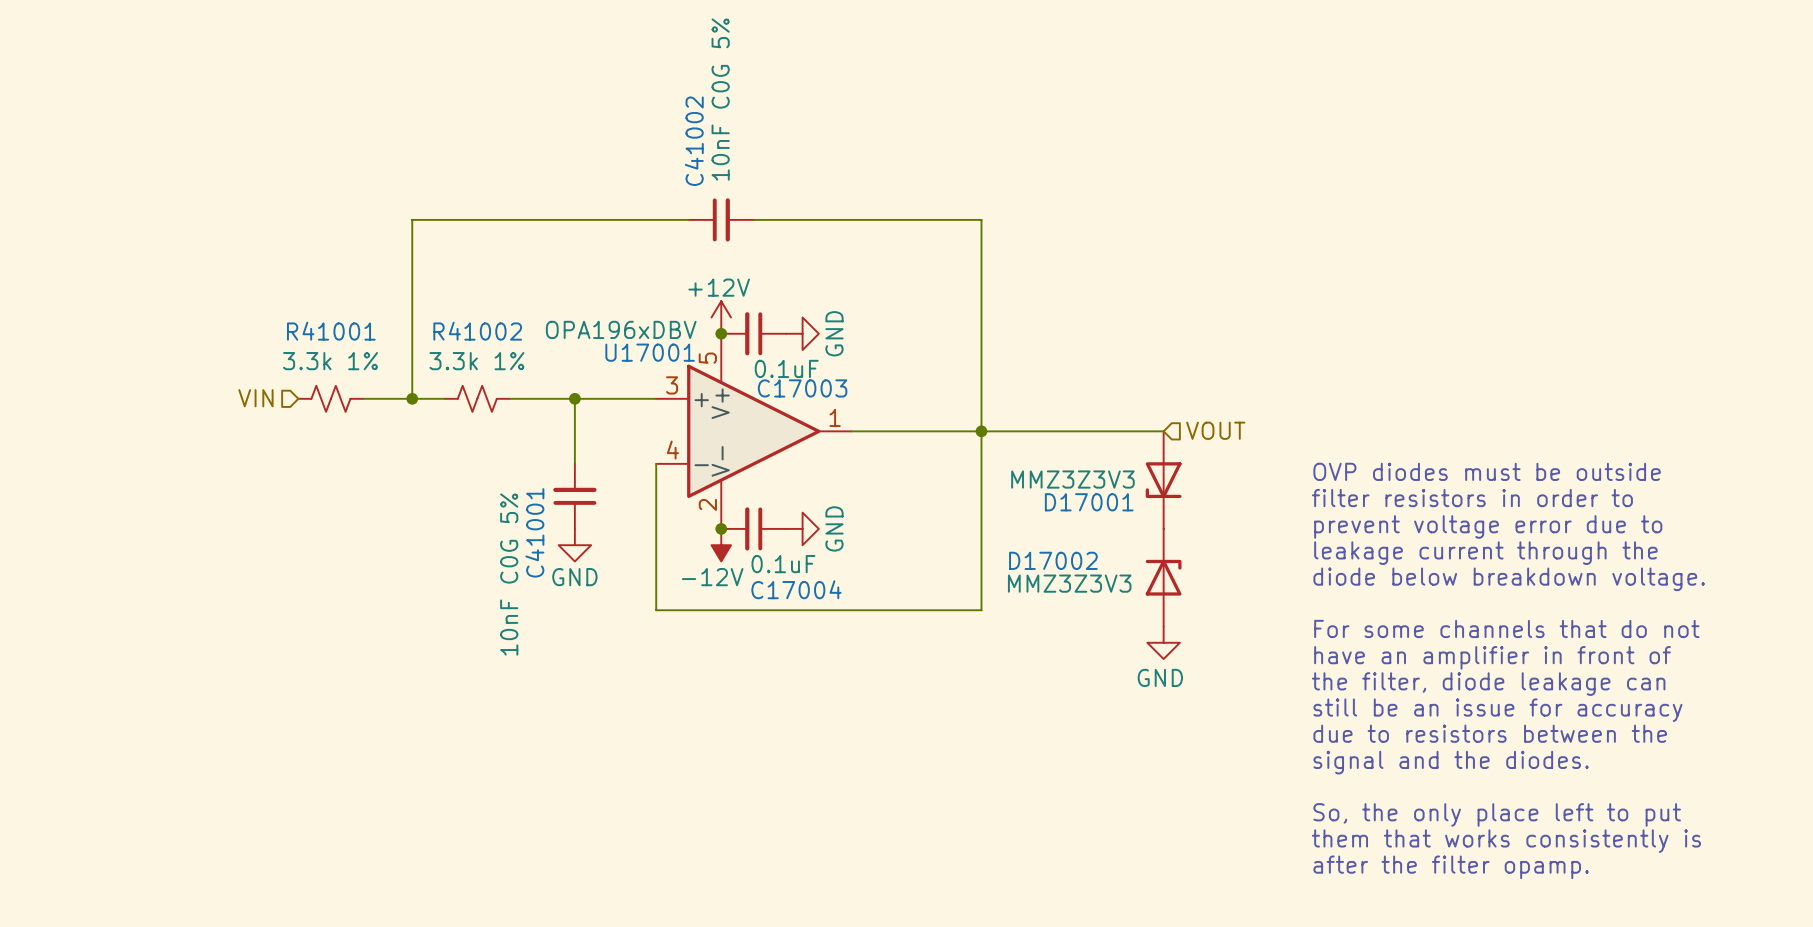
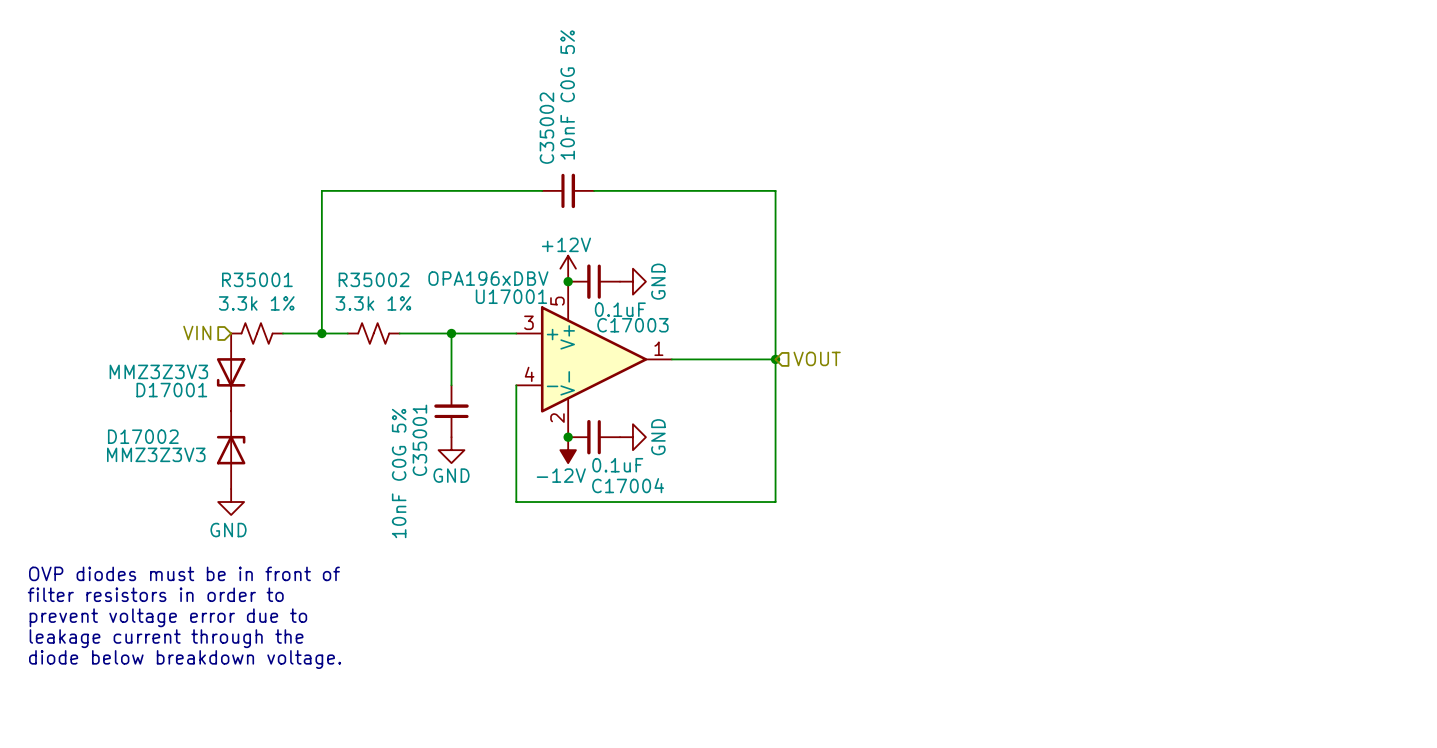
C41002 name: C41002 (694, 141) -> C35002 (546, 128)
R41001 name: R41001 (331, 331) -> R35001 (257, 279)
R41002 name: R41002 (477, 331) -> R35002 (374, 279)
hierarchical label position: VOUT (1215, 430) -> VOUT (817, 358)
wire: (981, 431) (1163, 431) -> none
text: OVP diodes must be outside (1487, 471) -> none
D17001 position: (1163, 480) -> (231, 372)
text: filter resistors in order to (1472, 498) -> none
text: prevent voltage error due to (1488, 526) -> none
C41001 name: C41001 (534, 532) -> C35001 (419, 440)
text: leakage current through the (1485, 553) -> none
D17002 position: (1163, 577) -> (231, 450)
text: diode below breakdown voltage. (1509, 579) -> none
power symbol: none -> GND (231, 502)
text: For some channels that do not (1506, 628) -> none
power symbol: GND (1163, 642) -> none
text: have an amplifier in front of (1492, 657) -> none
text: the filter, diode leakage can (1488, 684) -> none
text: none -> OVP diodes must be in front of (184, 573)
text: still be an issue for accuracy (1497, 710) -> none
text: none -> filter resistors in order to (155, 594)
text: due to resistors between the (1490, 733) -> none
text: none -> prevent voltage error due to (168, 617)
text: signal and the diodes. (1451, 762) -> none
text: none -> leakage current through the (166, 638)
text: none -> diode below breakdown voltage. (185, 659)
text: So, the only place left to put (1497, 814) -> none
text: them that works consistently is (1506, 841) -> none
text: after the filter opamp. (1451, 867) -> none

